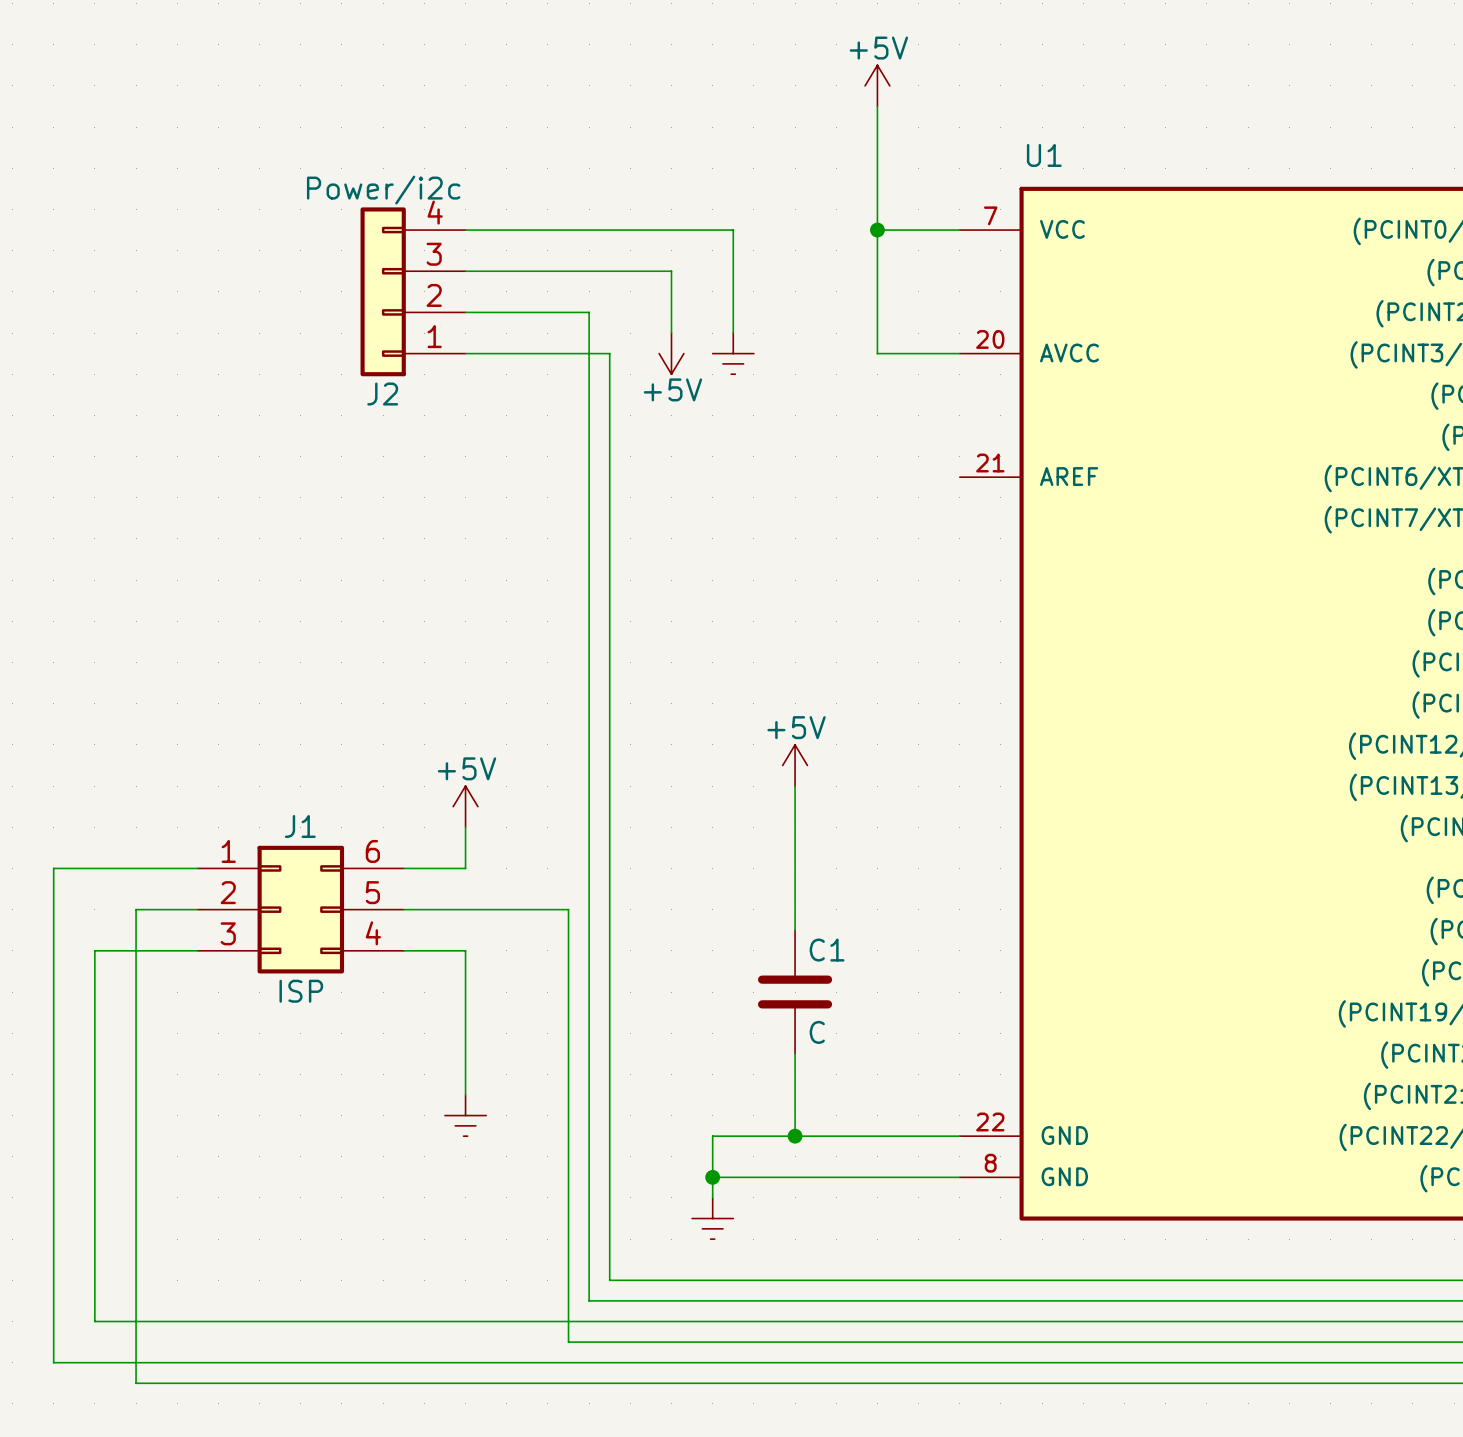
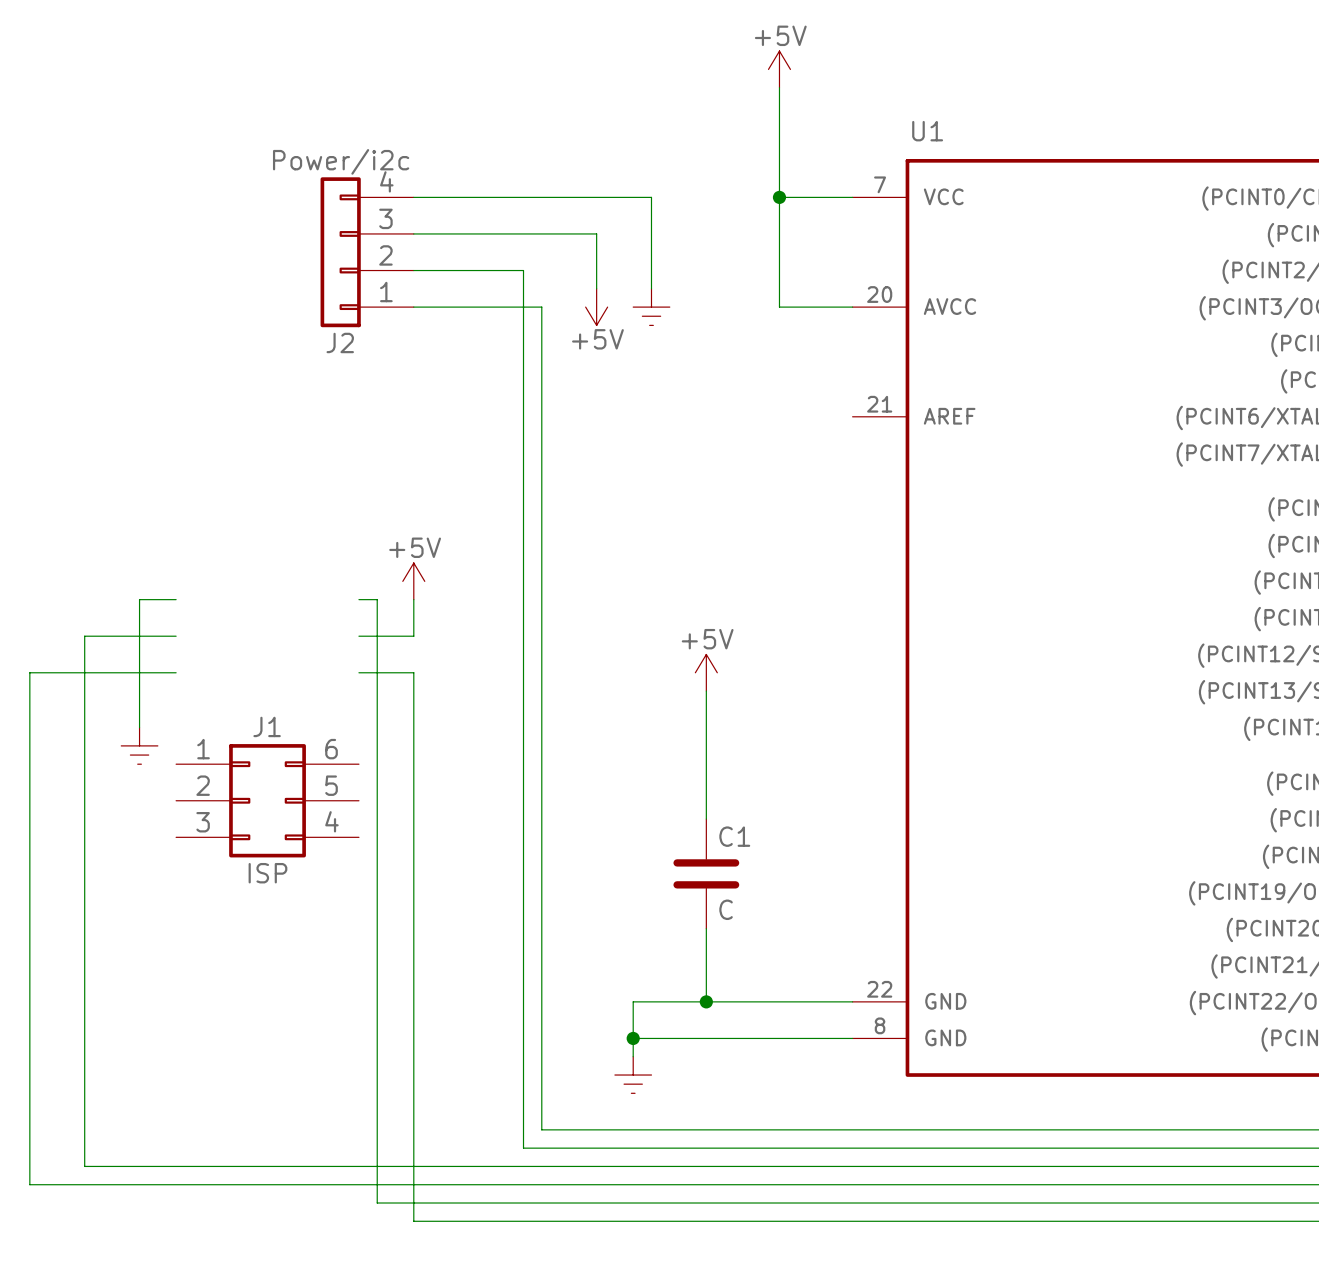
wire: none -> (176, 599) (139, 599) (139, 727)
wire: none -> (413, 599) (413, 636) (358, 636)
wire: none -> (358, 672) (413, 672) (413, 727)
power symbol position: +5V (465, 806) -> +5V (413, 581)
power symbol: none -> (139, 745)
wire: (197, 868) (53, 868) (53, 1362) (424, 1362) -> (358, 599) (377, 599) (377, 1203)
wire: (403, 868) (465, 868) -> (413, 837) (413, 764)
wire: (197, 909) (136, 909) (136, 1383) (465, 1383) -> (413, 965) (413, 1221)
wire: (403, 909) (568, 909) (568, 1342) -> (176, 672) (29, 672) (29, 1184) (505, 1184)
wire: (94, 950) (197, 950) -> (84, 837) (84, 636) (176, 636)
wire: (403, 950) (465, 950) -> none
power symbol: (465, 1115) -> none

